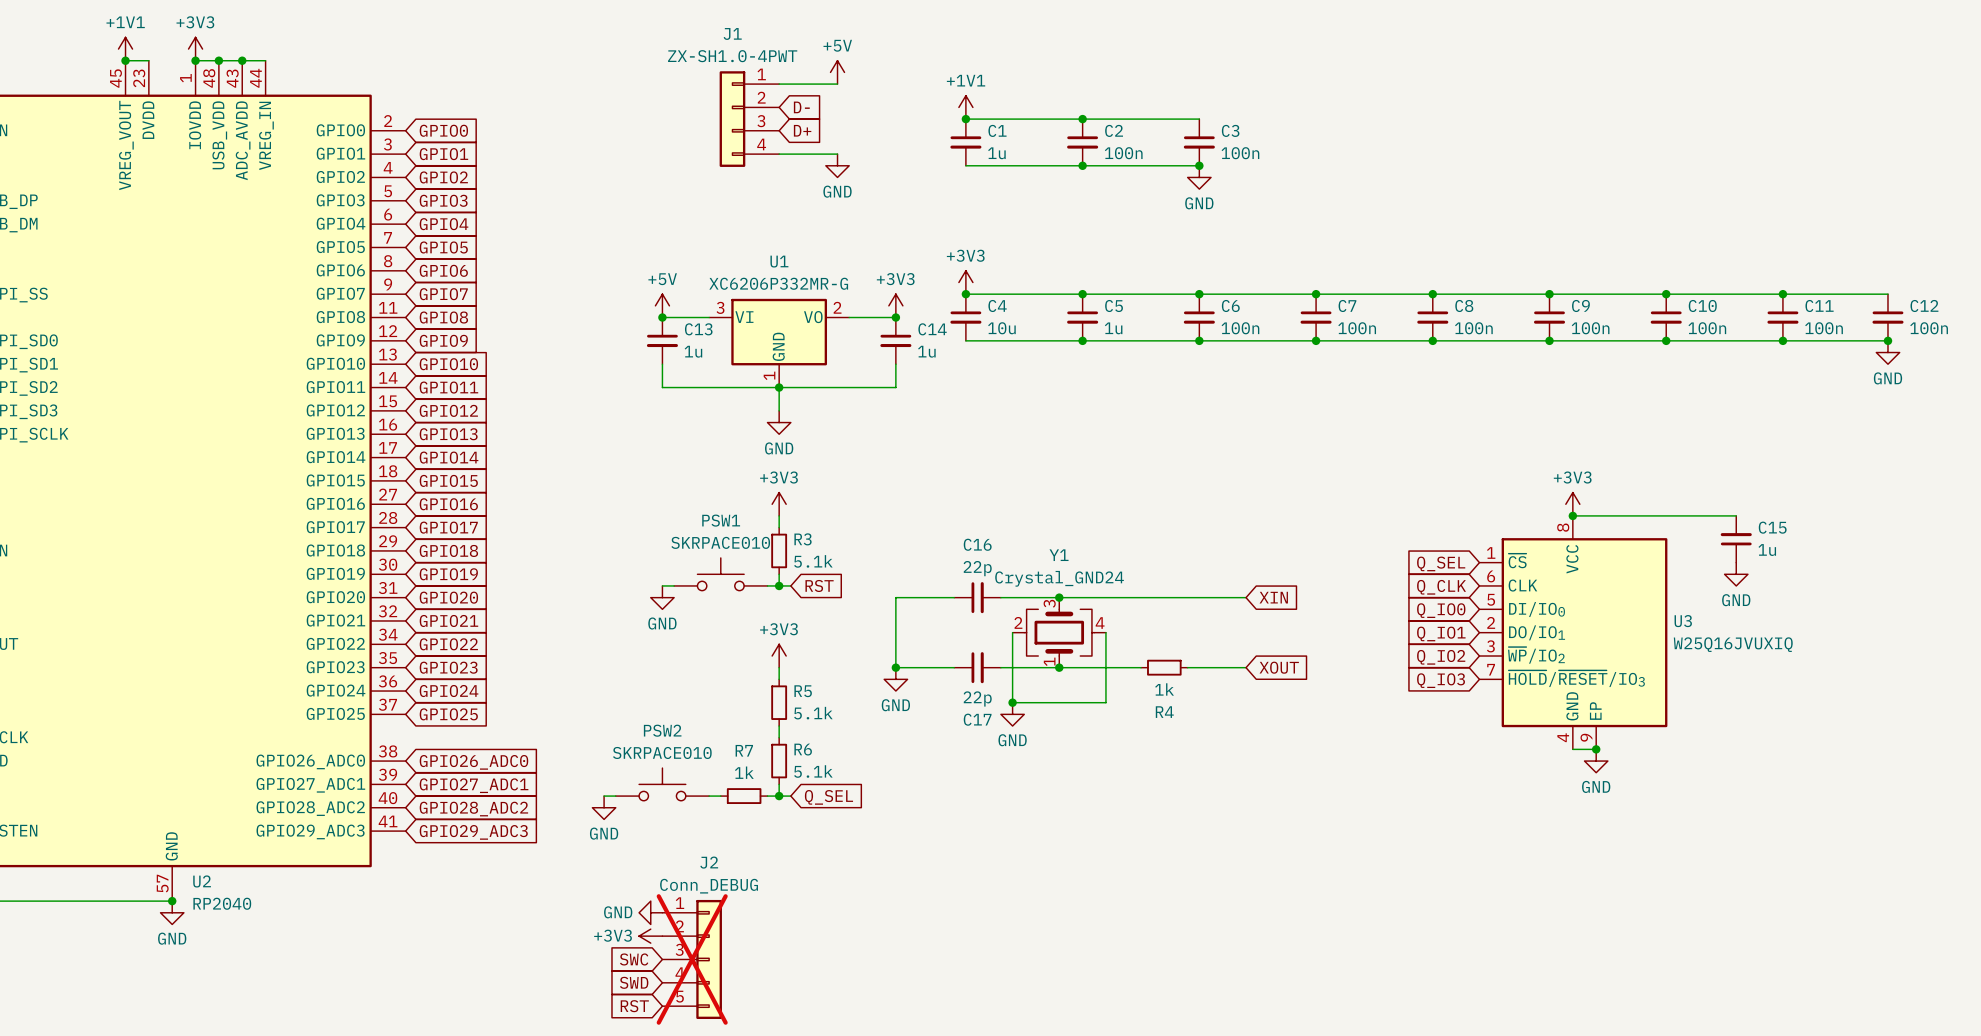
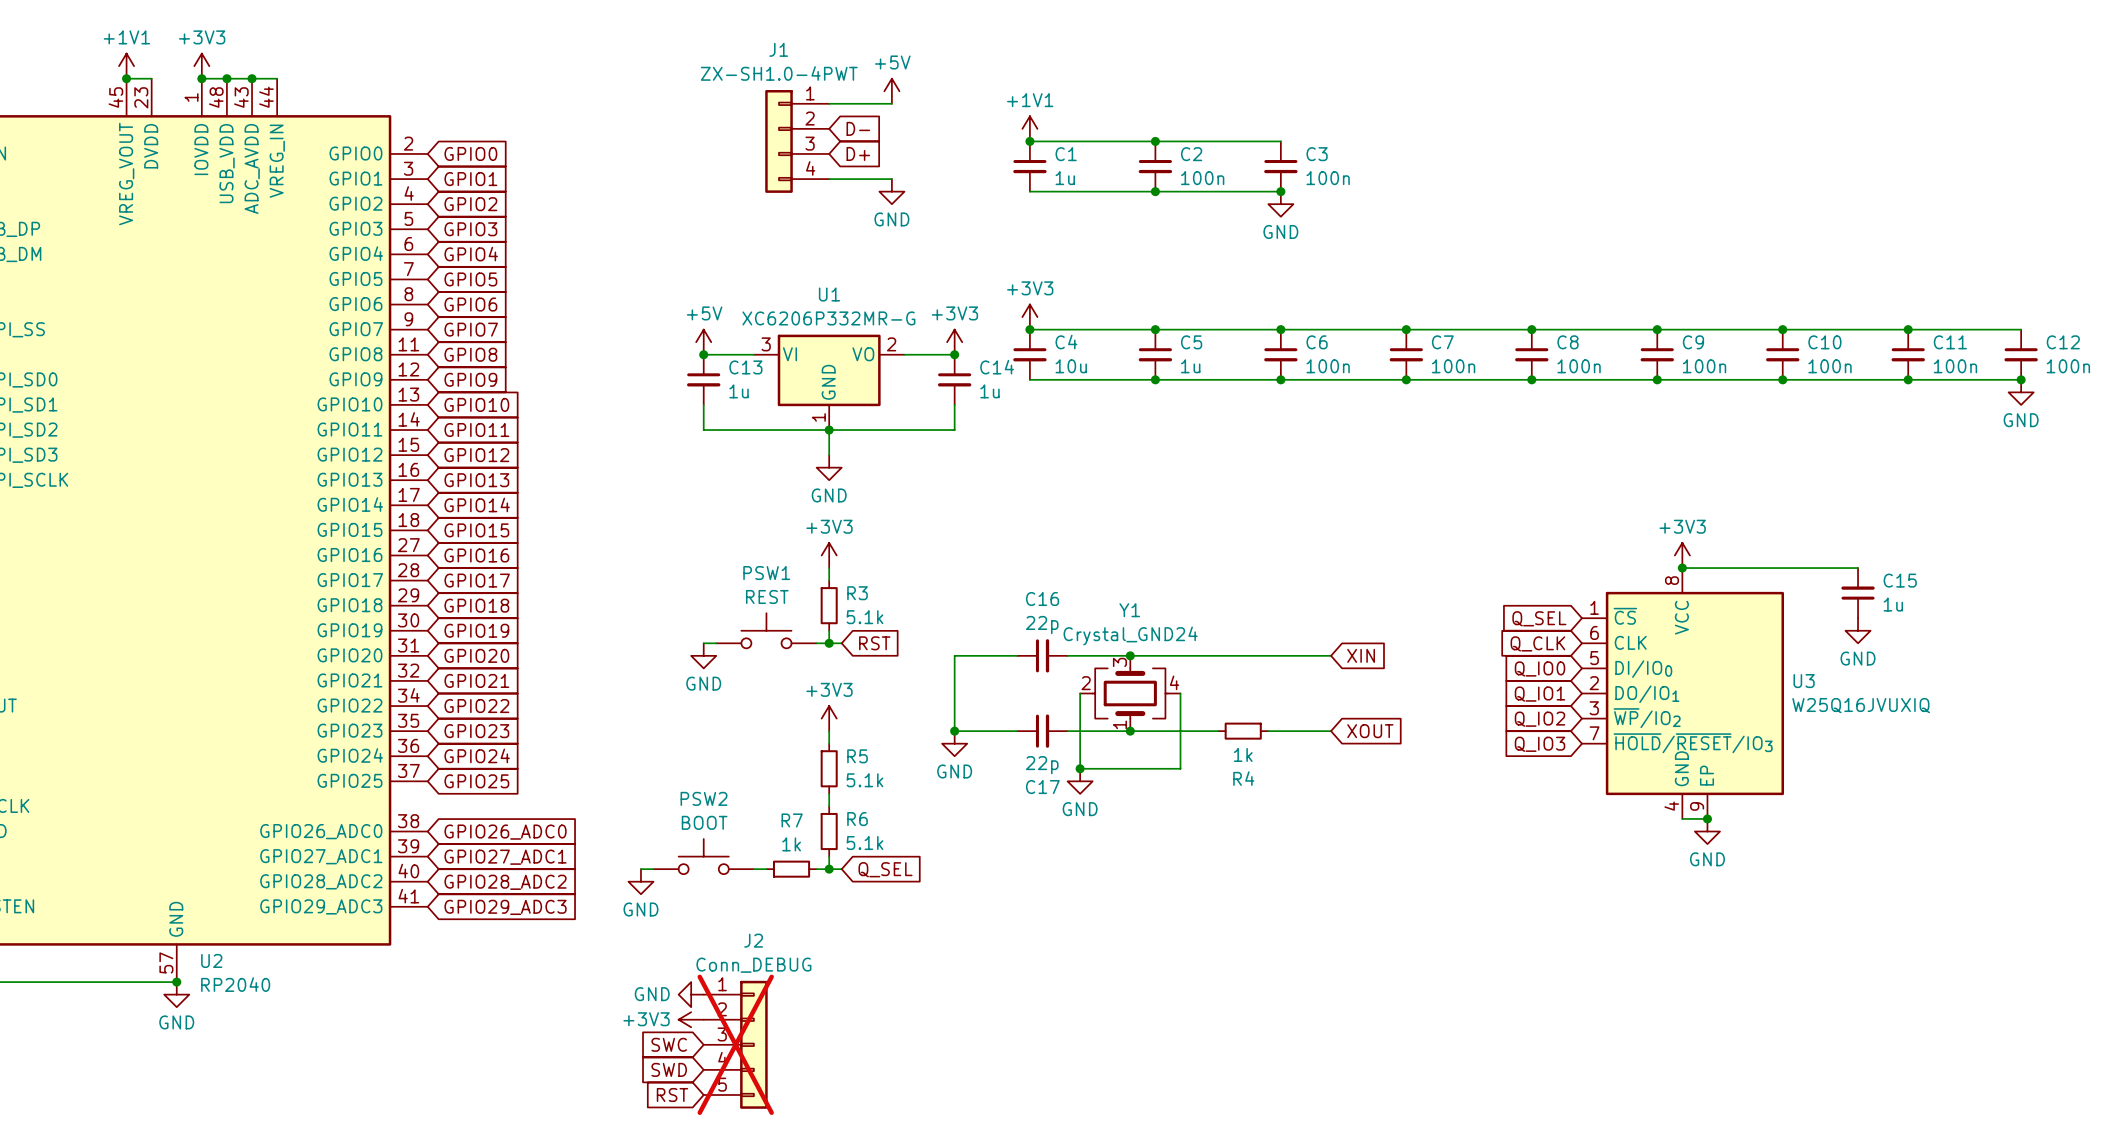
PSW1 value: SKRPACE010 (720, 542) -> REST (767, 596)
PSW2 value: SKRPACE010 (662, 752) -> BOOT (704, 822)

